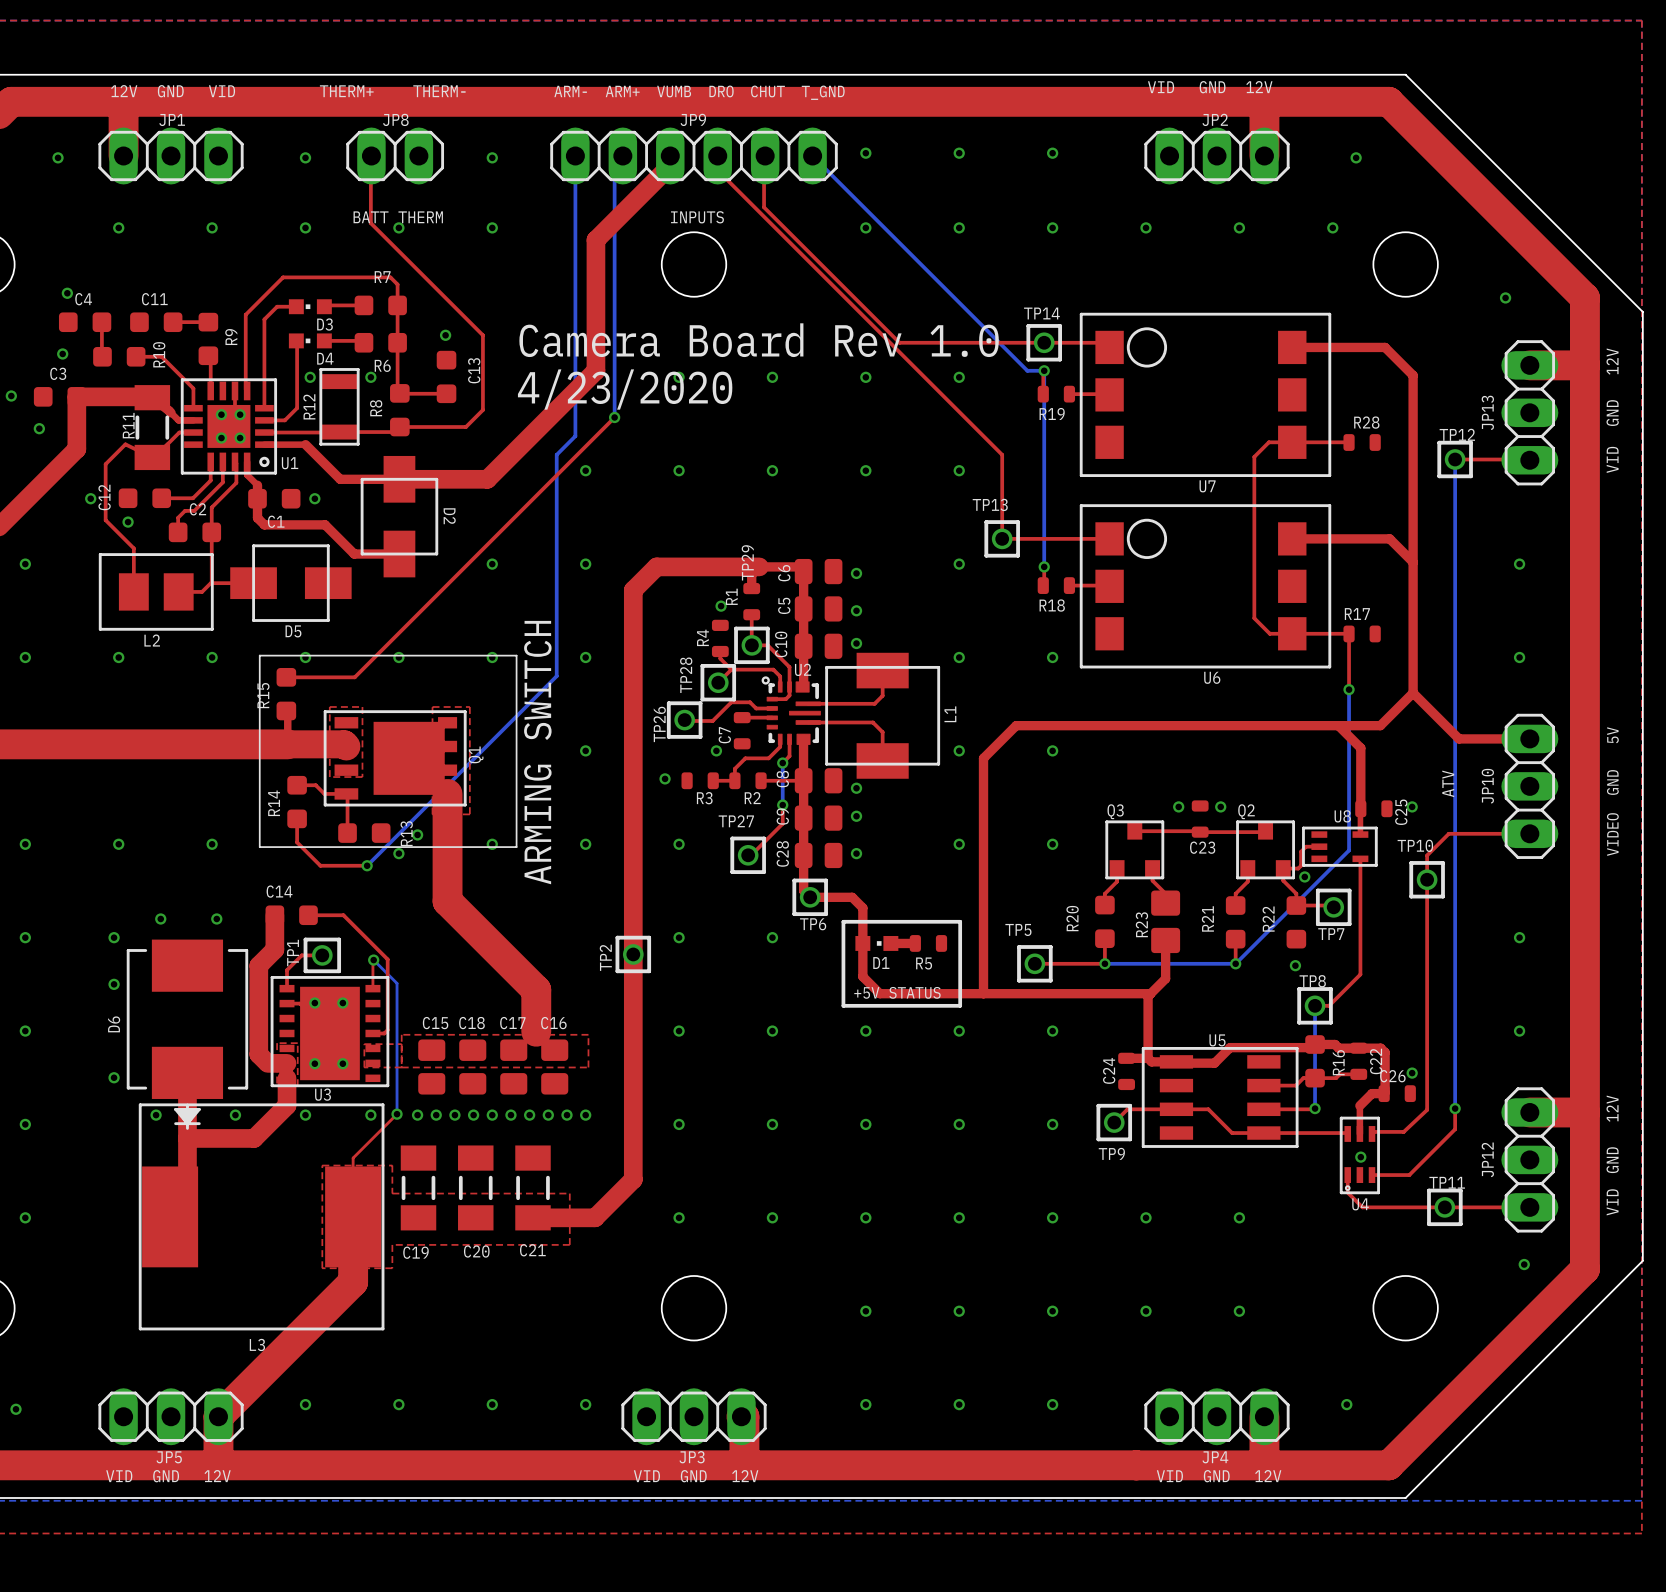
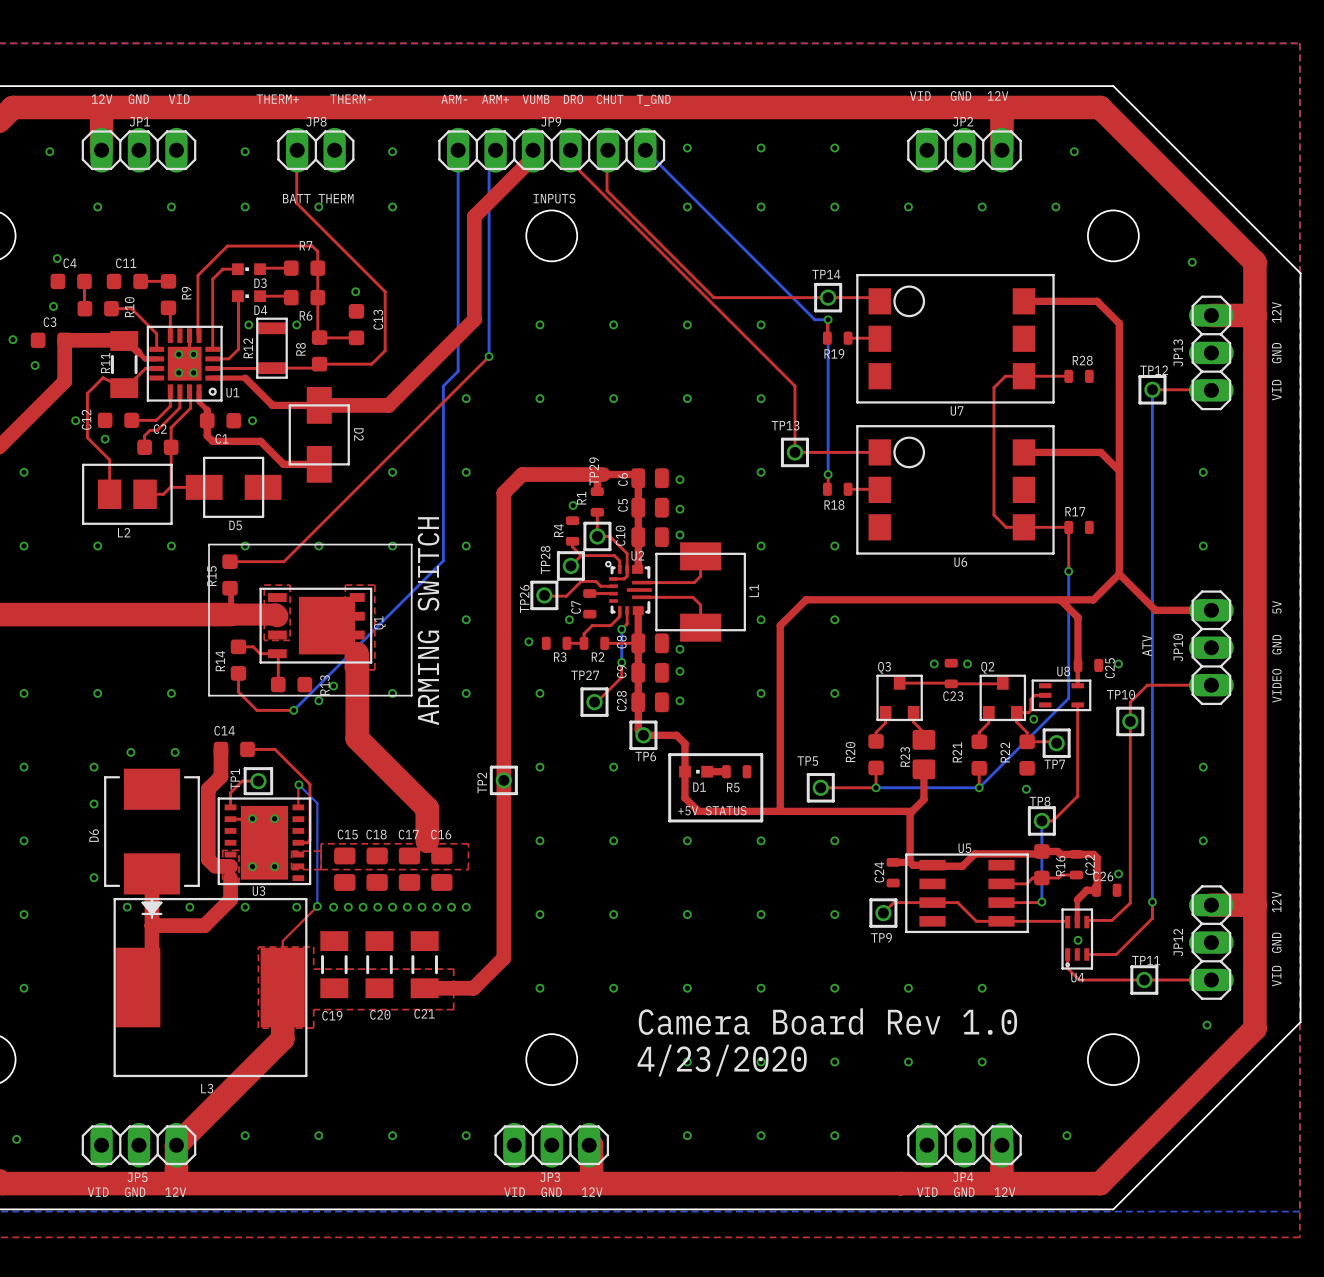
text: Camera Board Rev 1.0 (759, 340) -> none
text: 4/23/2020 (625, 389) -> none
text: none -> Camera Board Rev 1.0 (827, 1021)
text: none -> 4/23/2020 (722, 1060)

